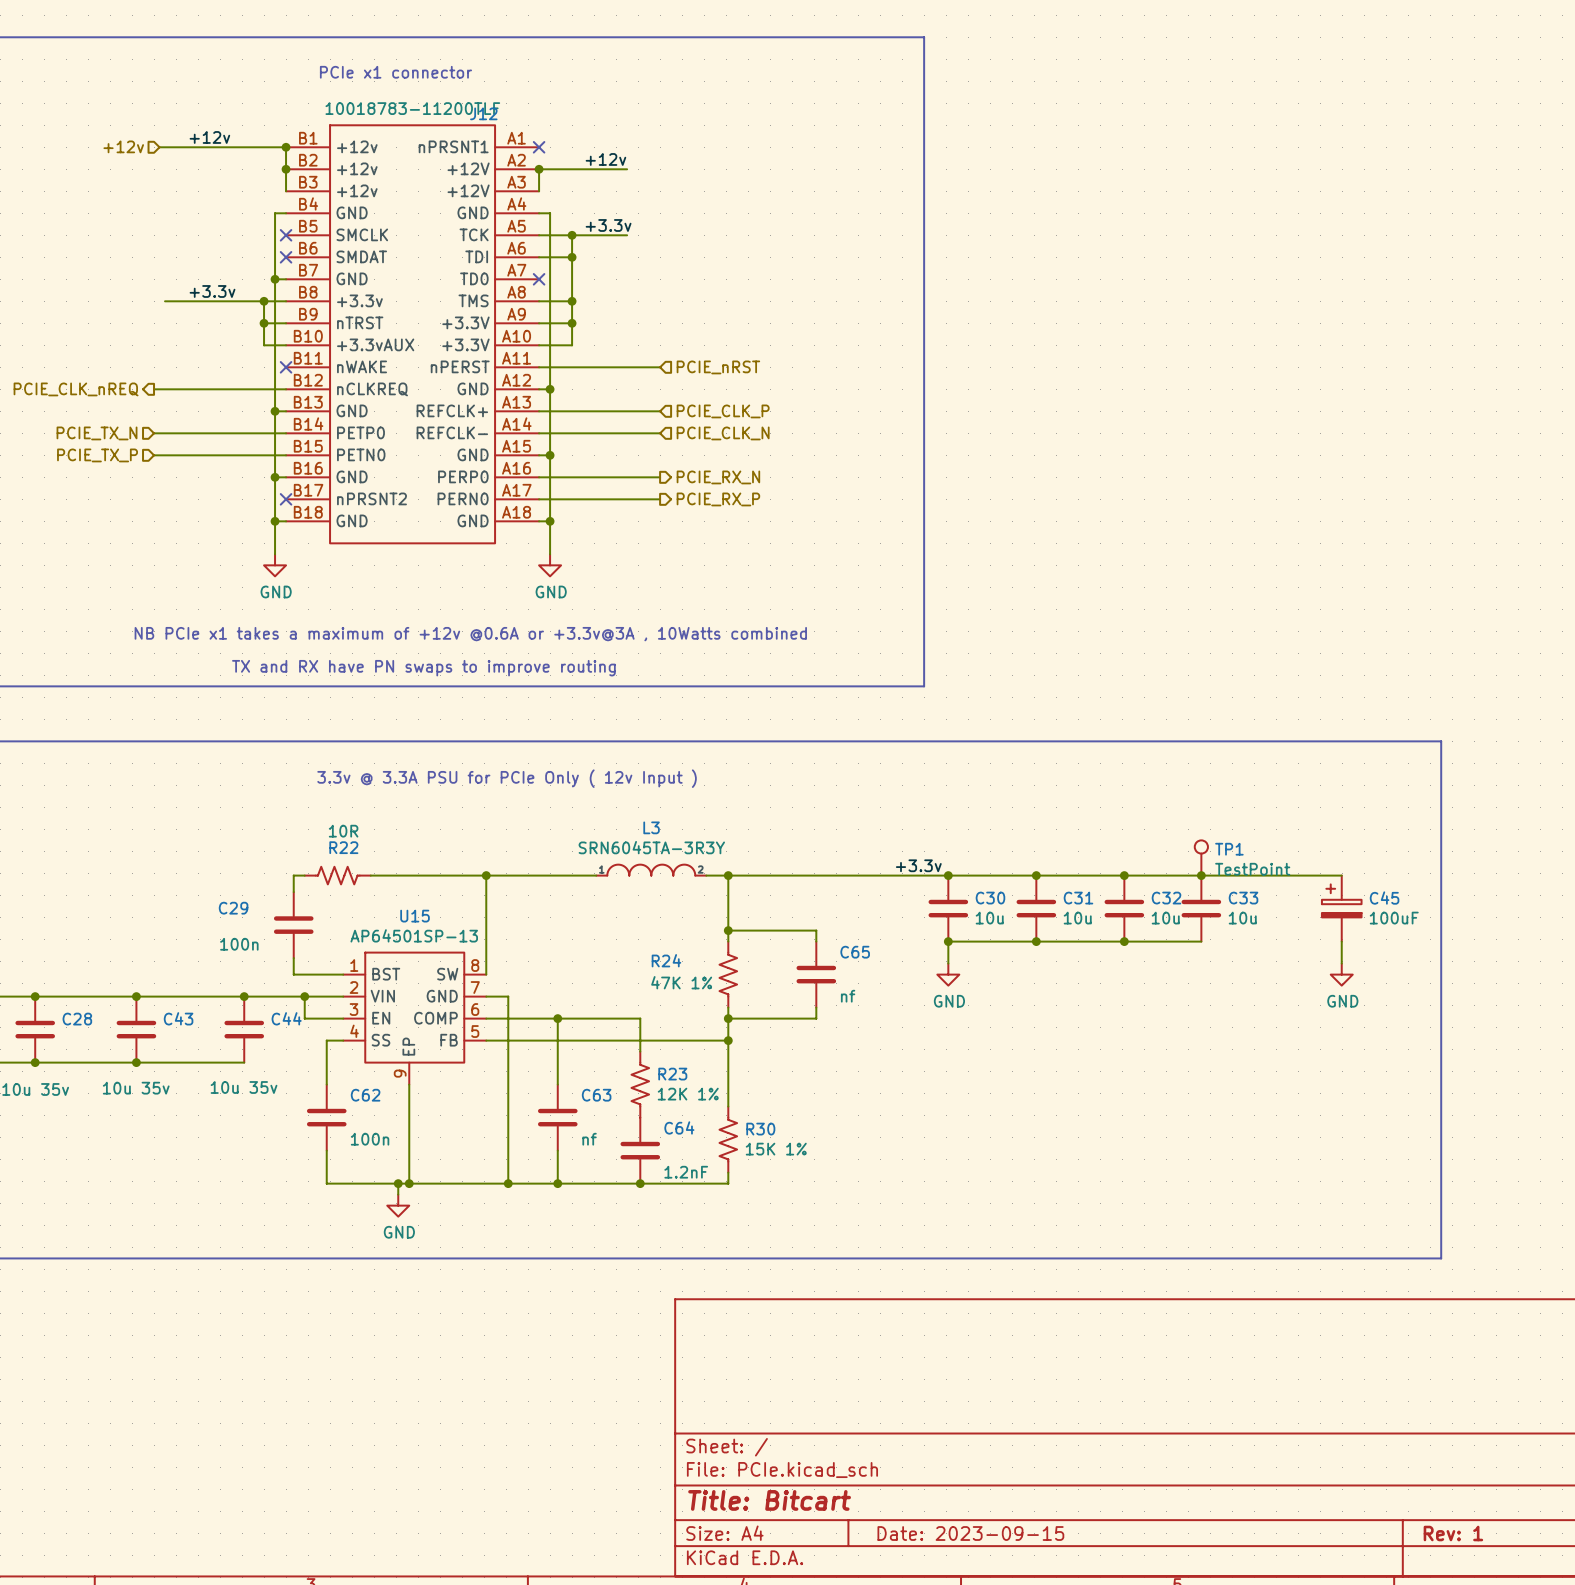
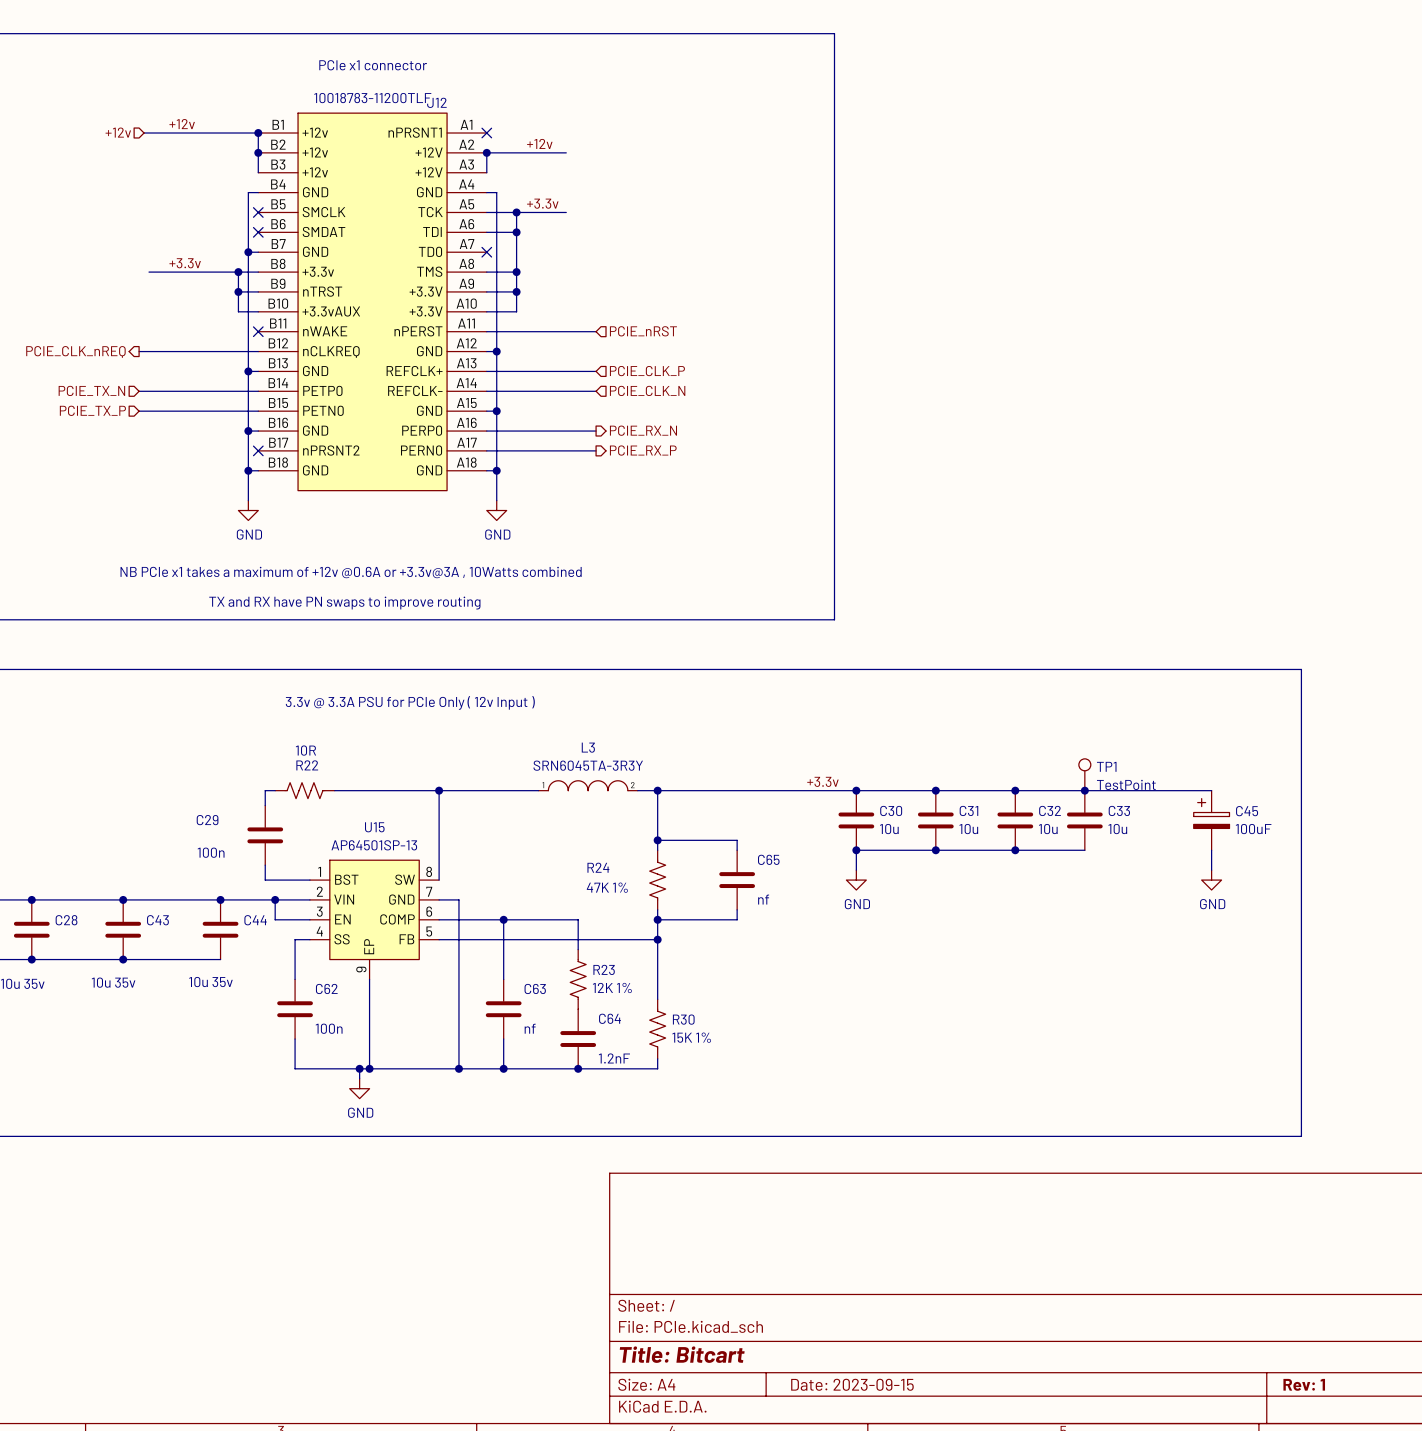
J12 symbol: [286, 125, 540, 544] -> [258, 113, 487, 491]
U15 symbol: [343, 952, 487, 1085] -> [309, 860, 440, 980]

